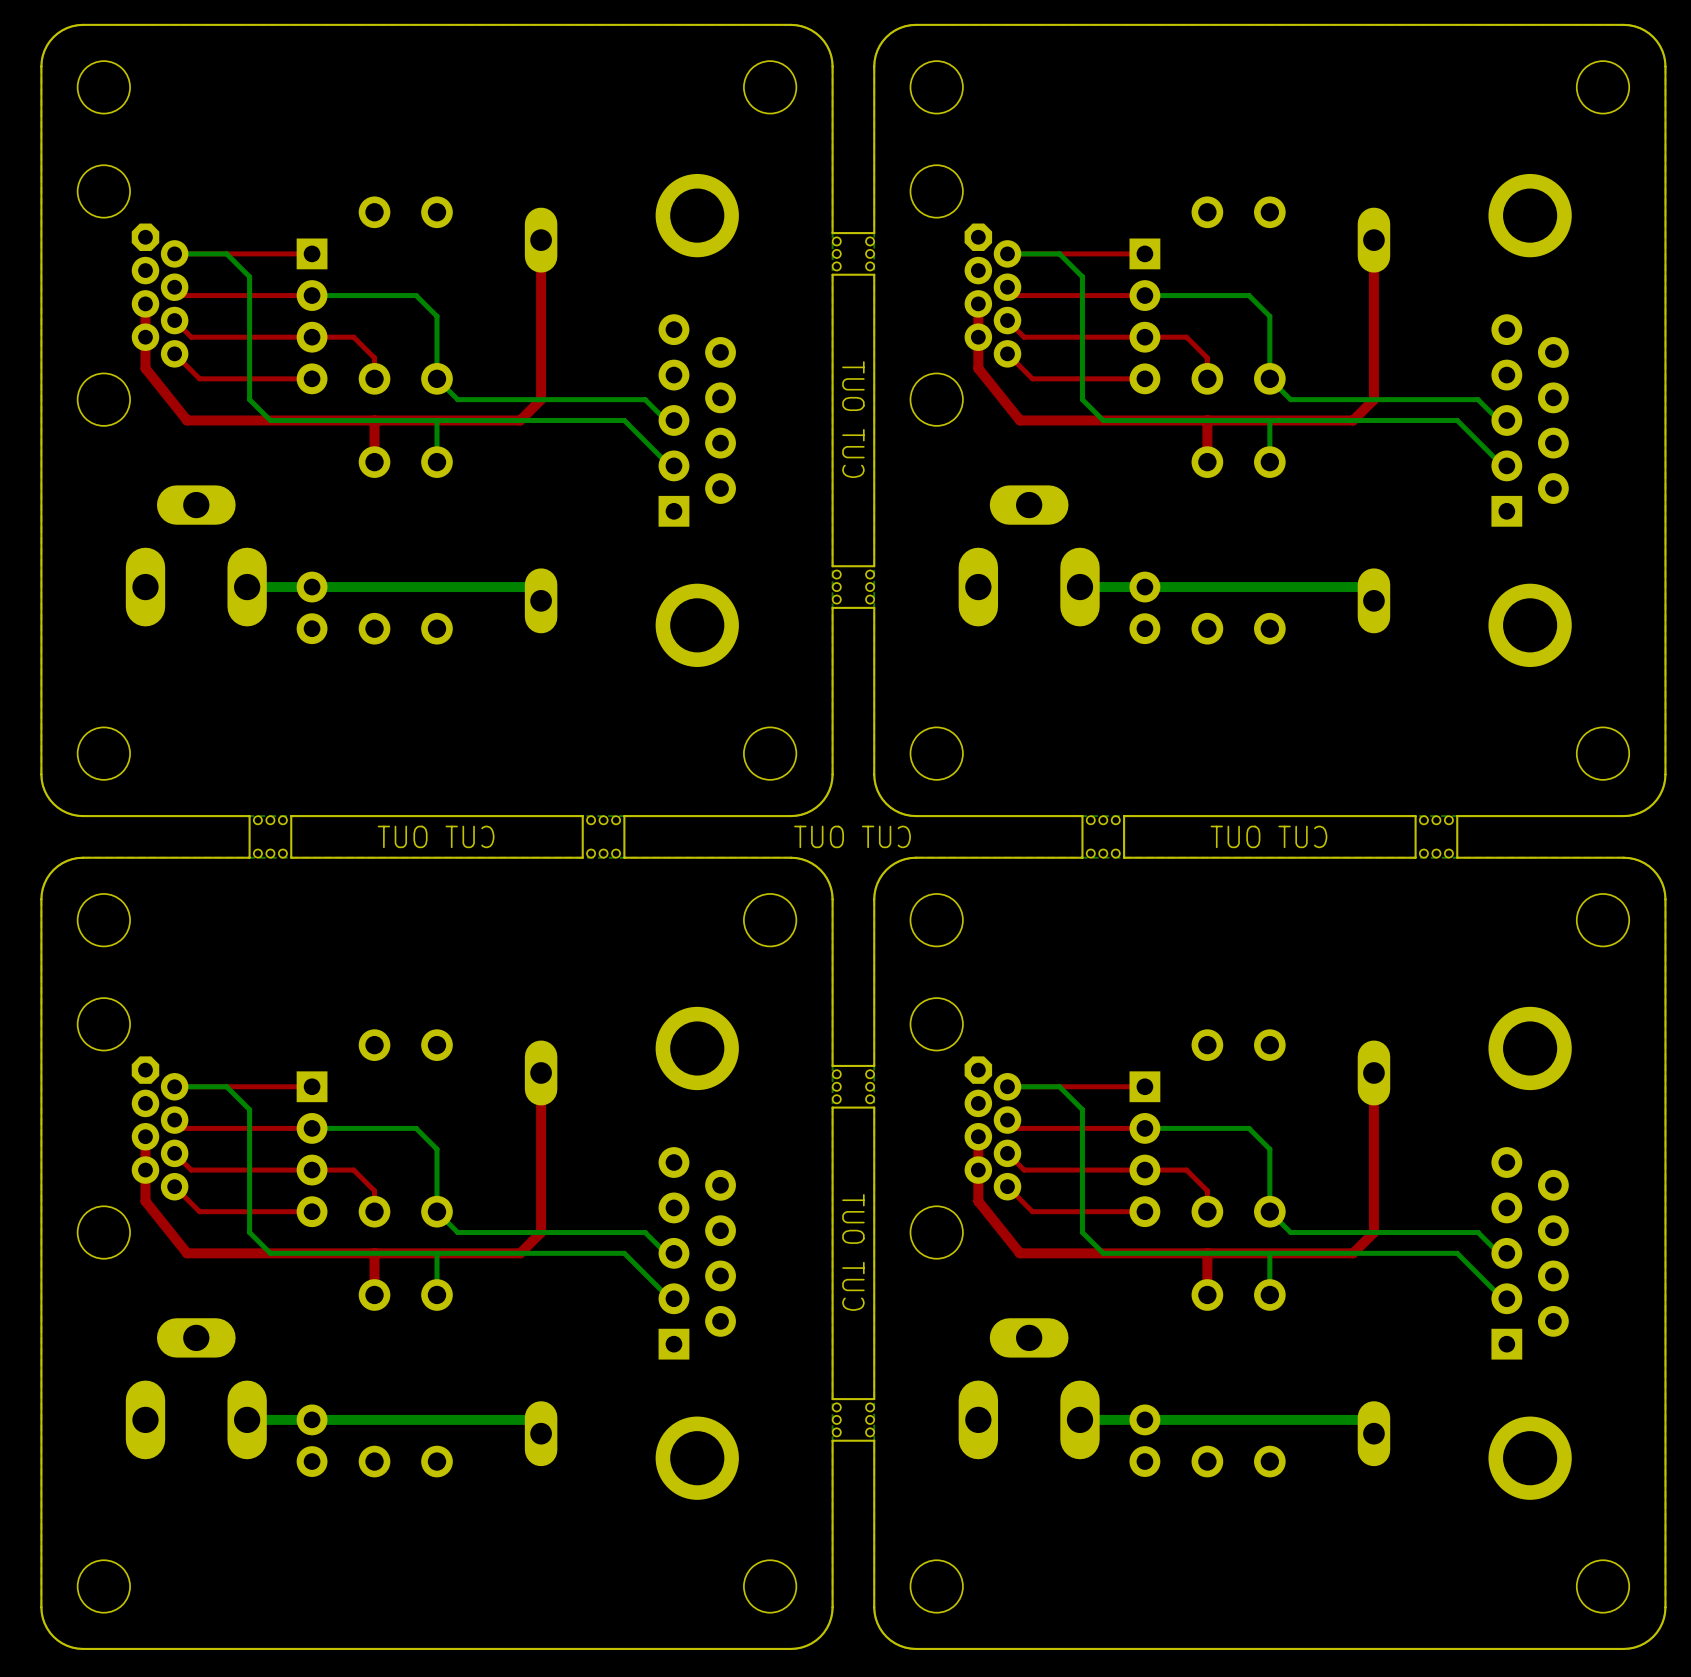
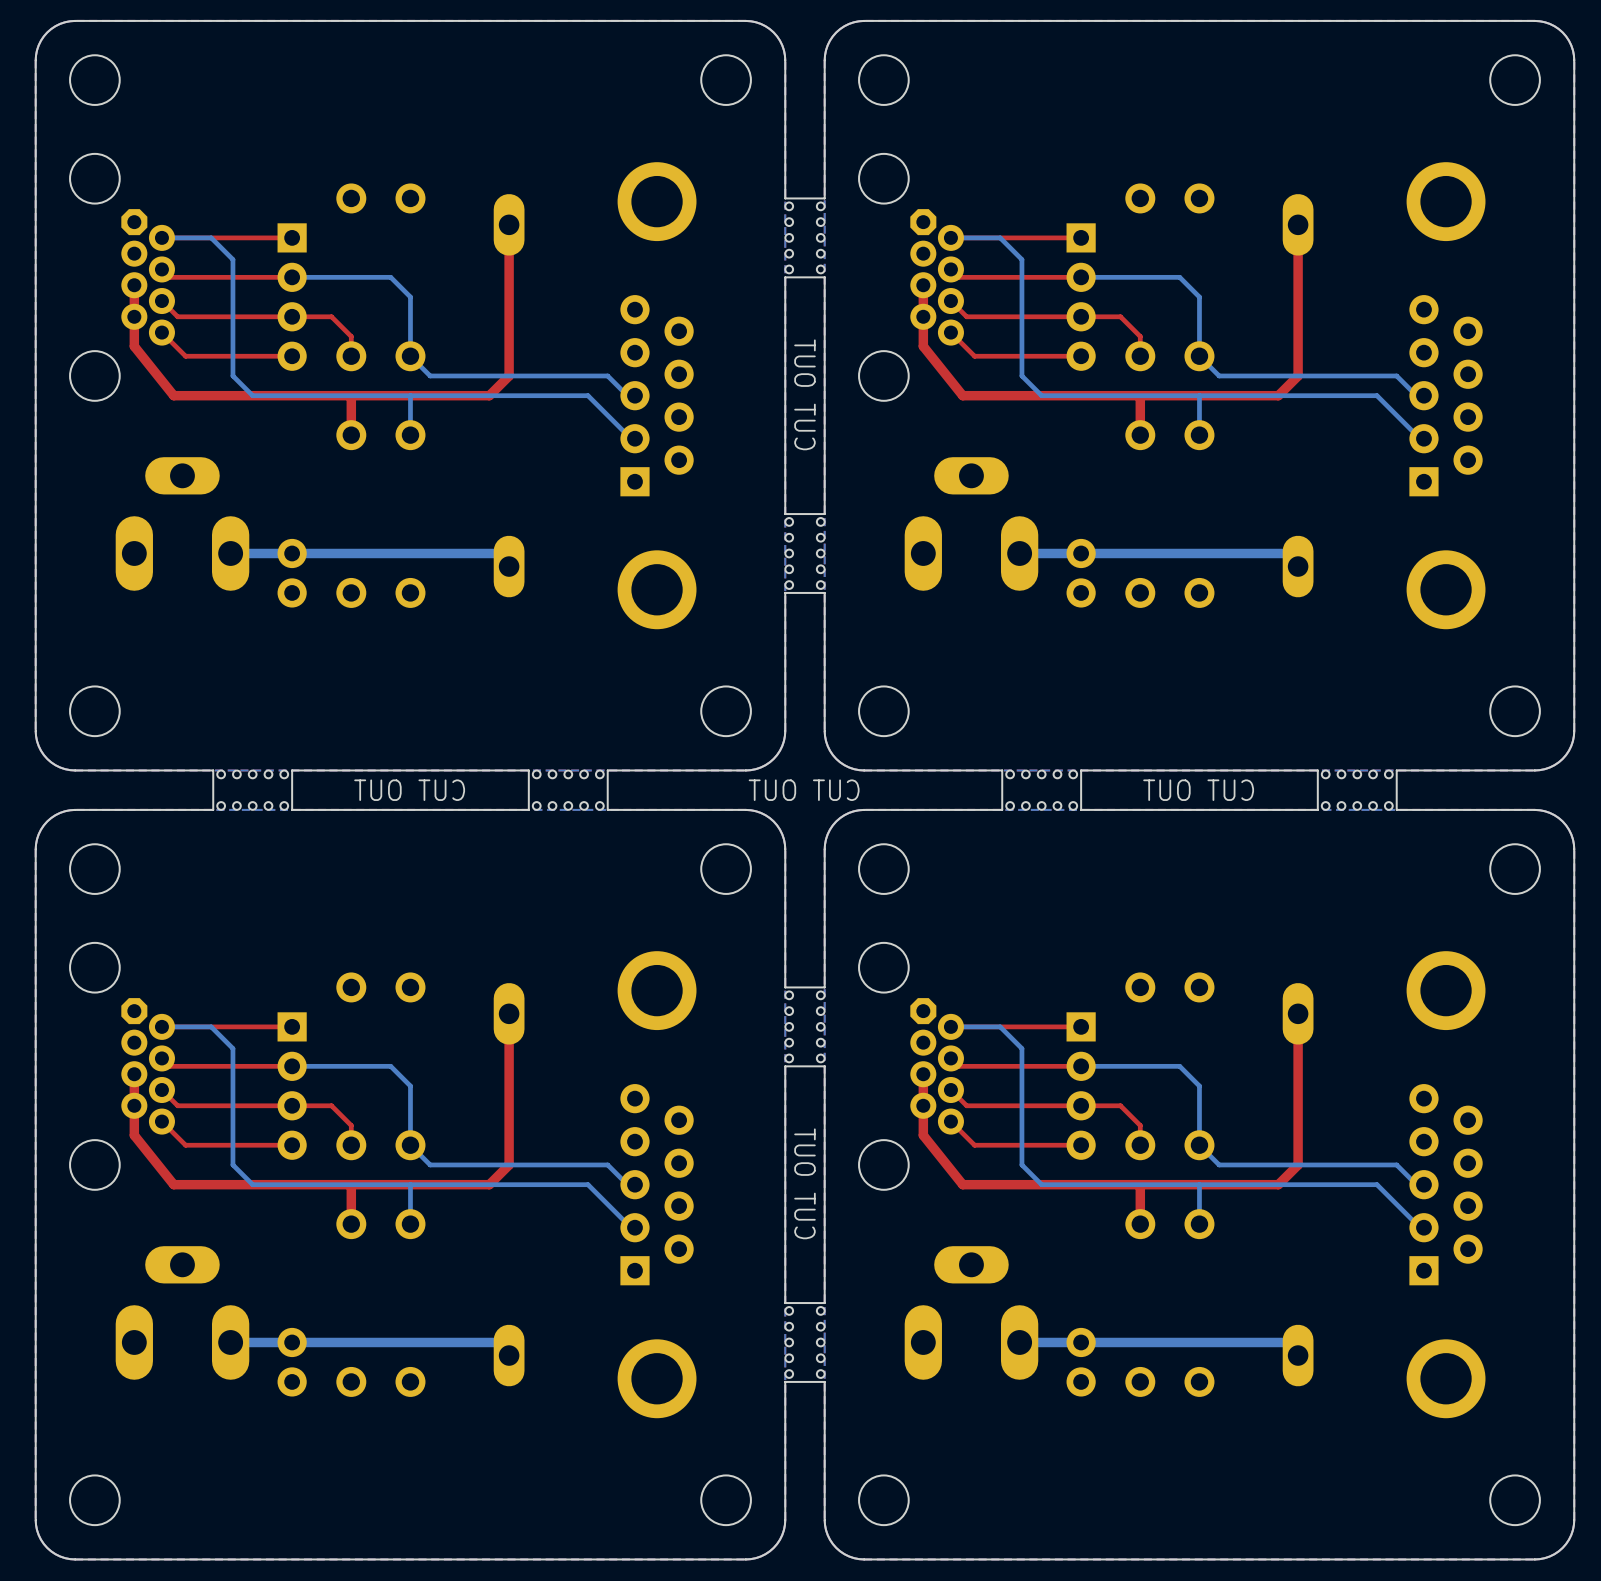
part footprint: [40, 23, 1667, 1650] -> [34, 19, 1576, 1561]

